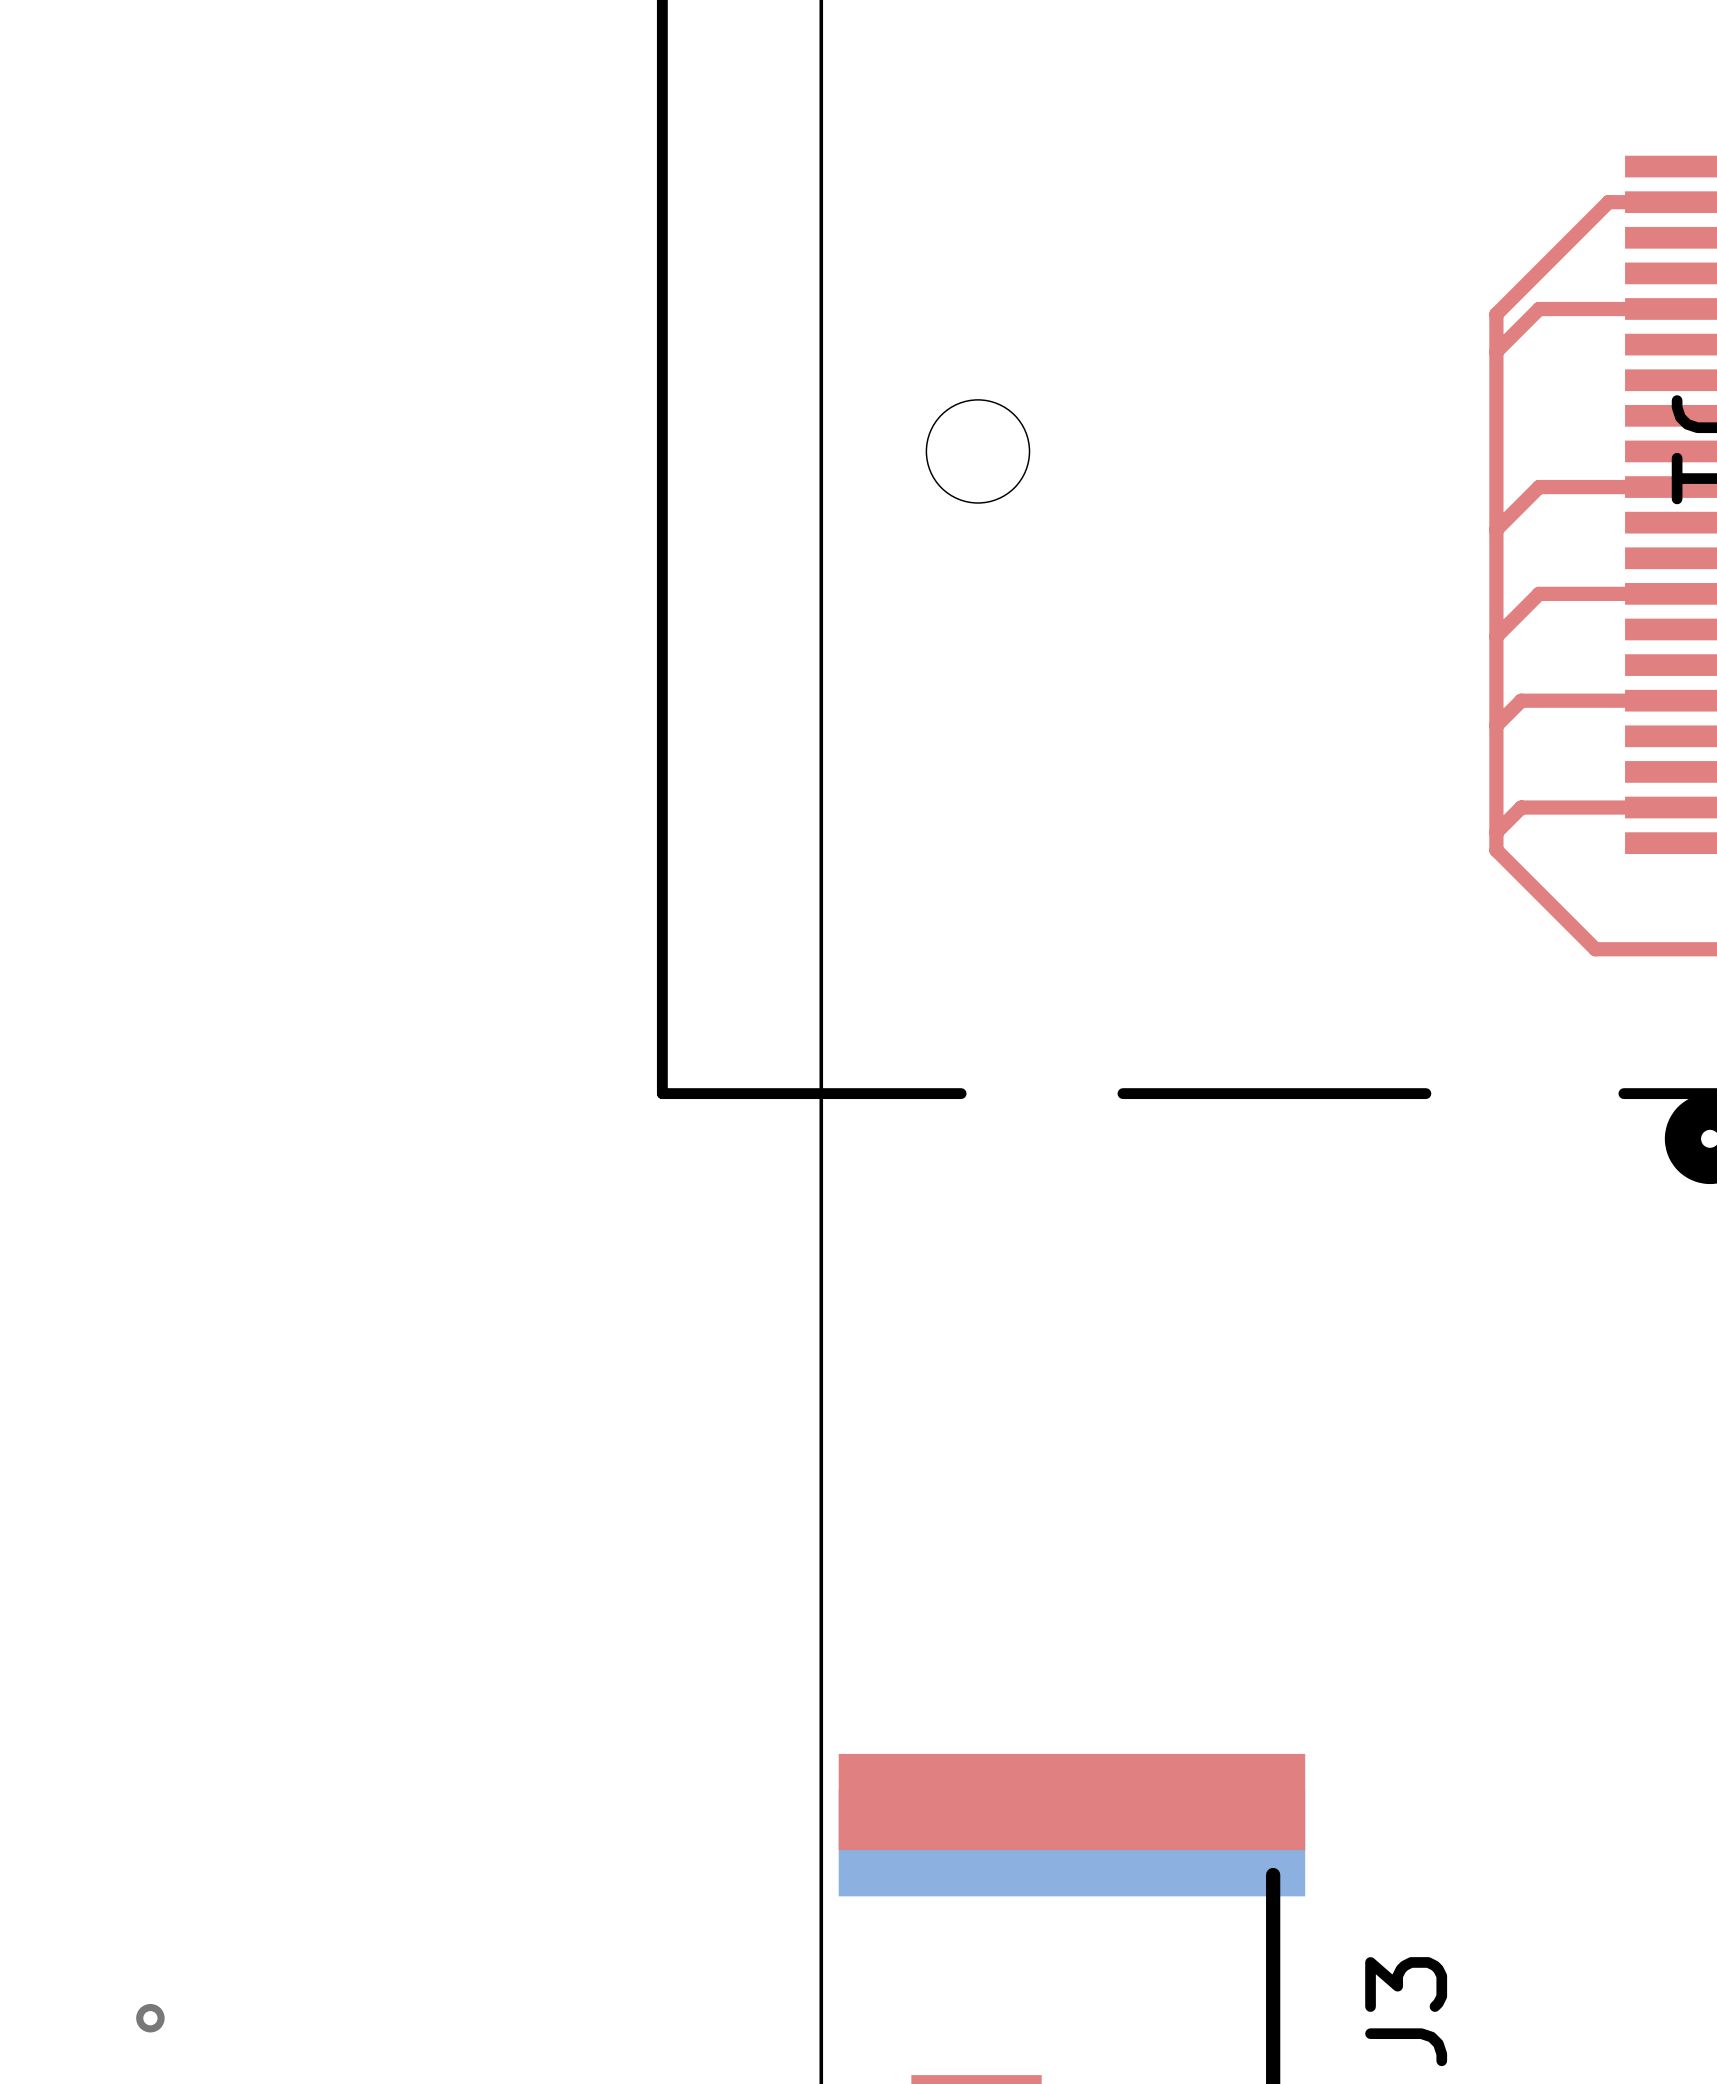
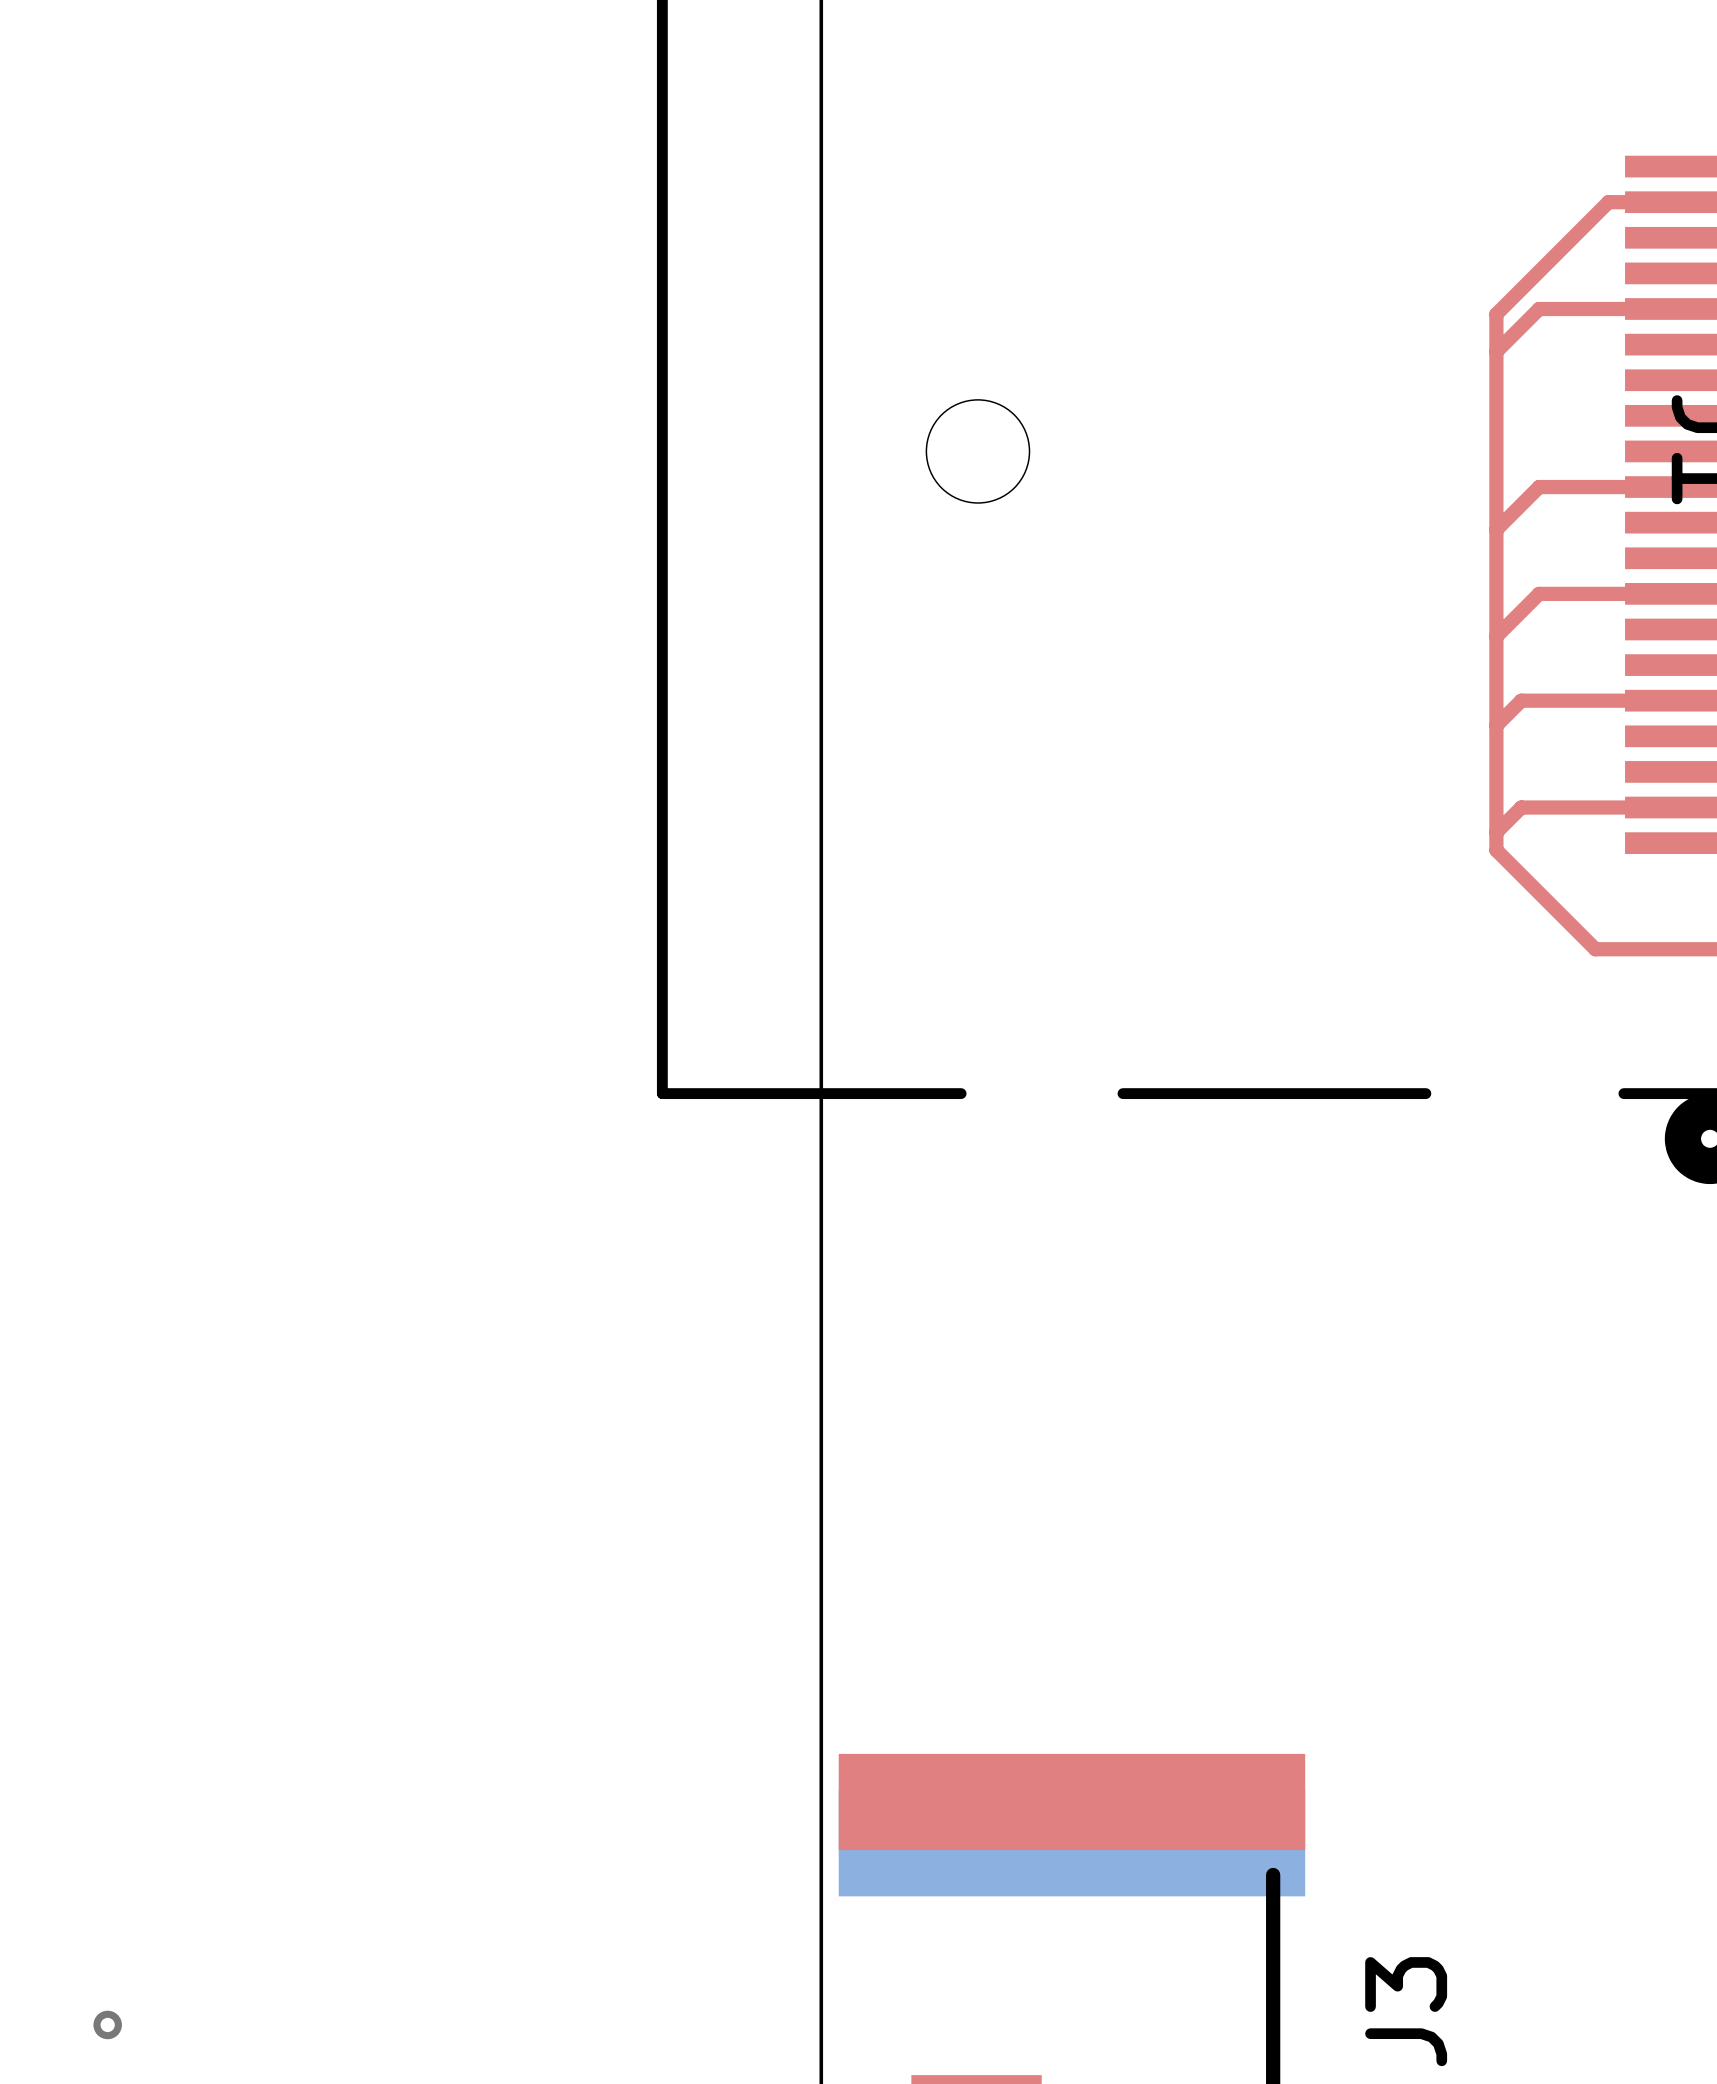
via position: (150, 2018) -> (107, 2024)

